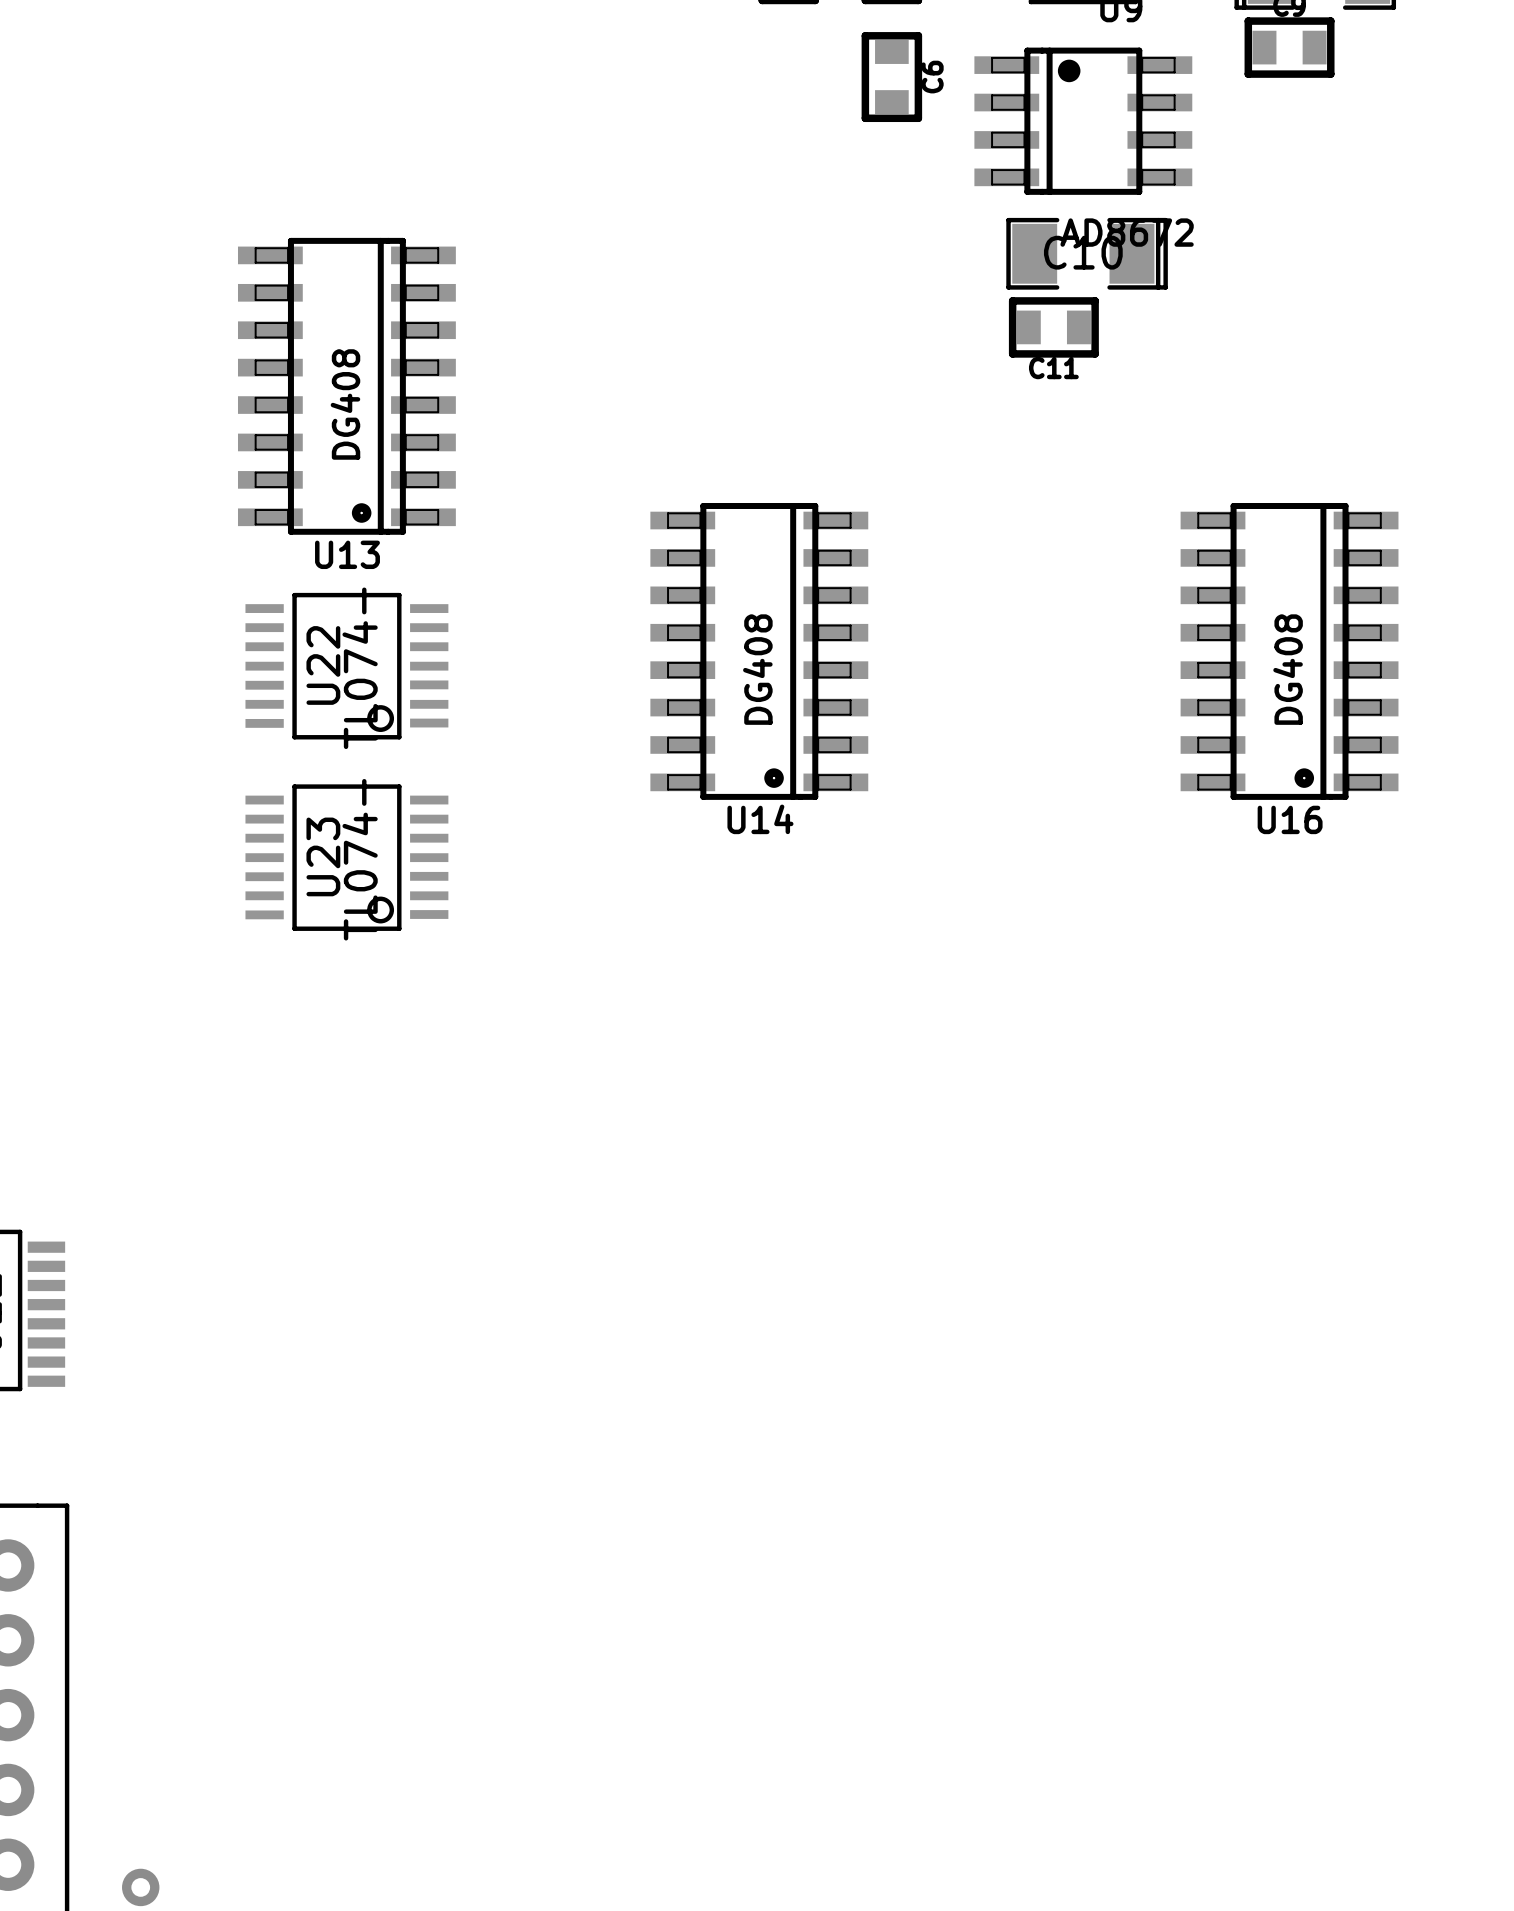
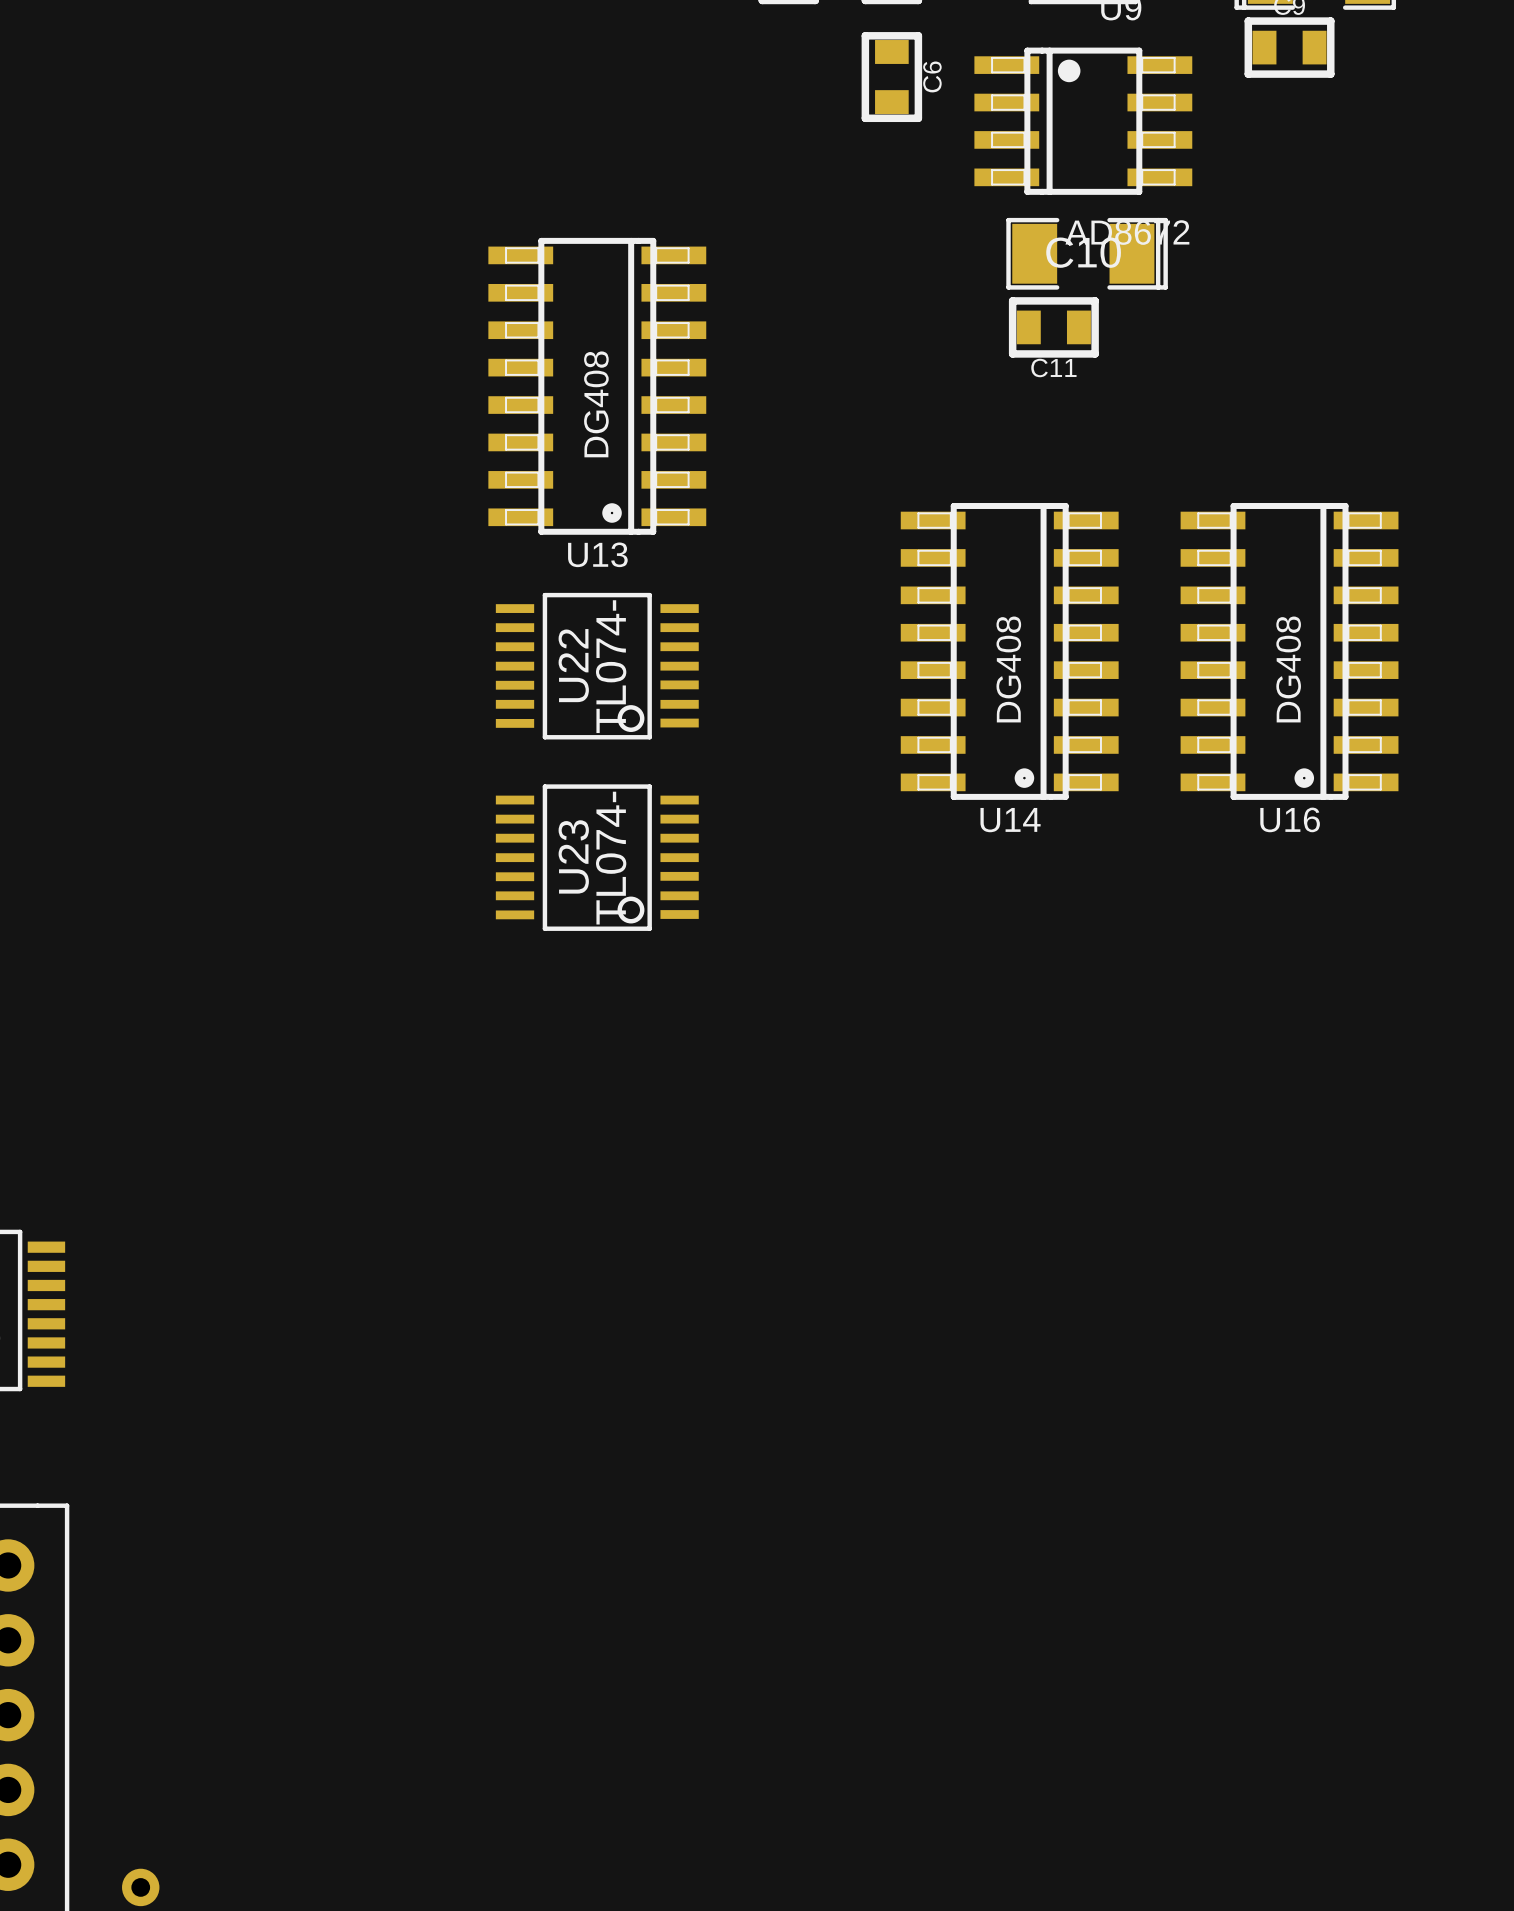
U13 position: (346, 386) -> (597, 386)
U14 position: (759, 651) -> (1009, 651)
U22 position: (346, 666) -> (597, 666)
U23 position: (346, 857) -> (597, 857)

